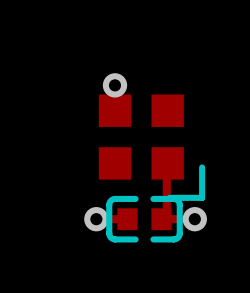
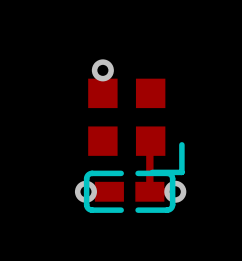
part footprint: [106, 195, 183, 243] -> [83, 170, 176, 213]

